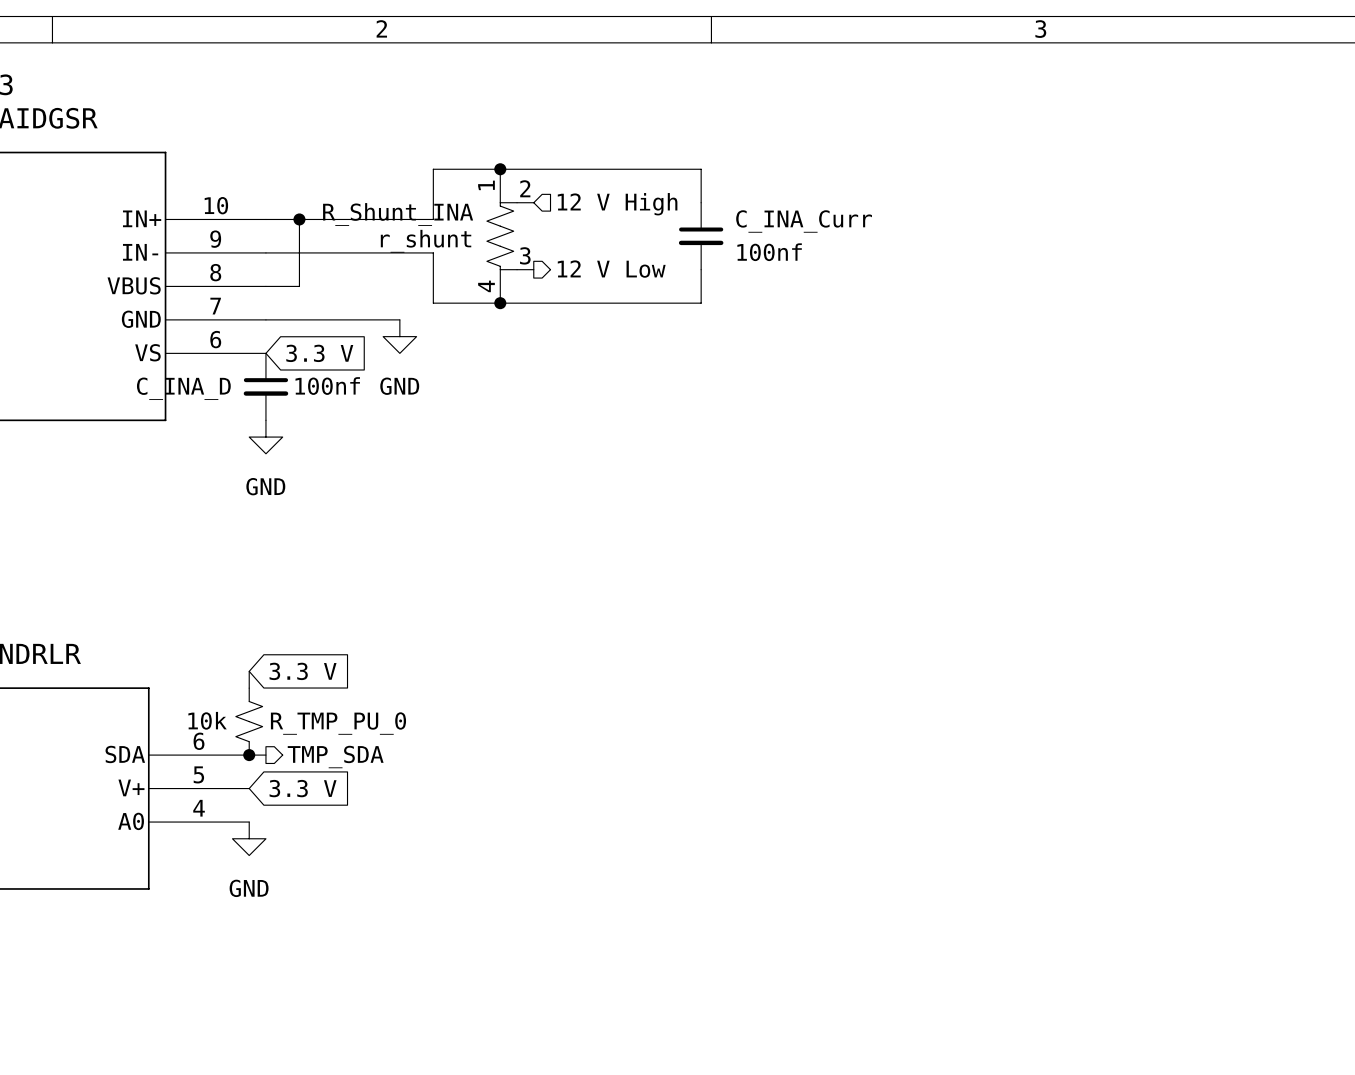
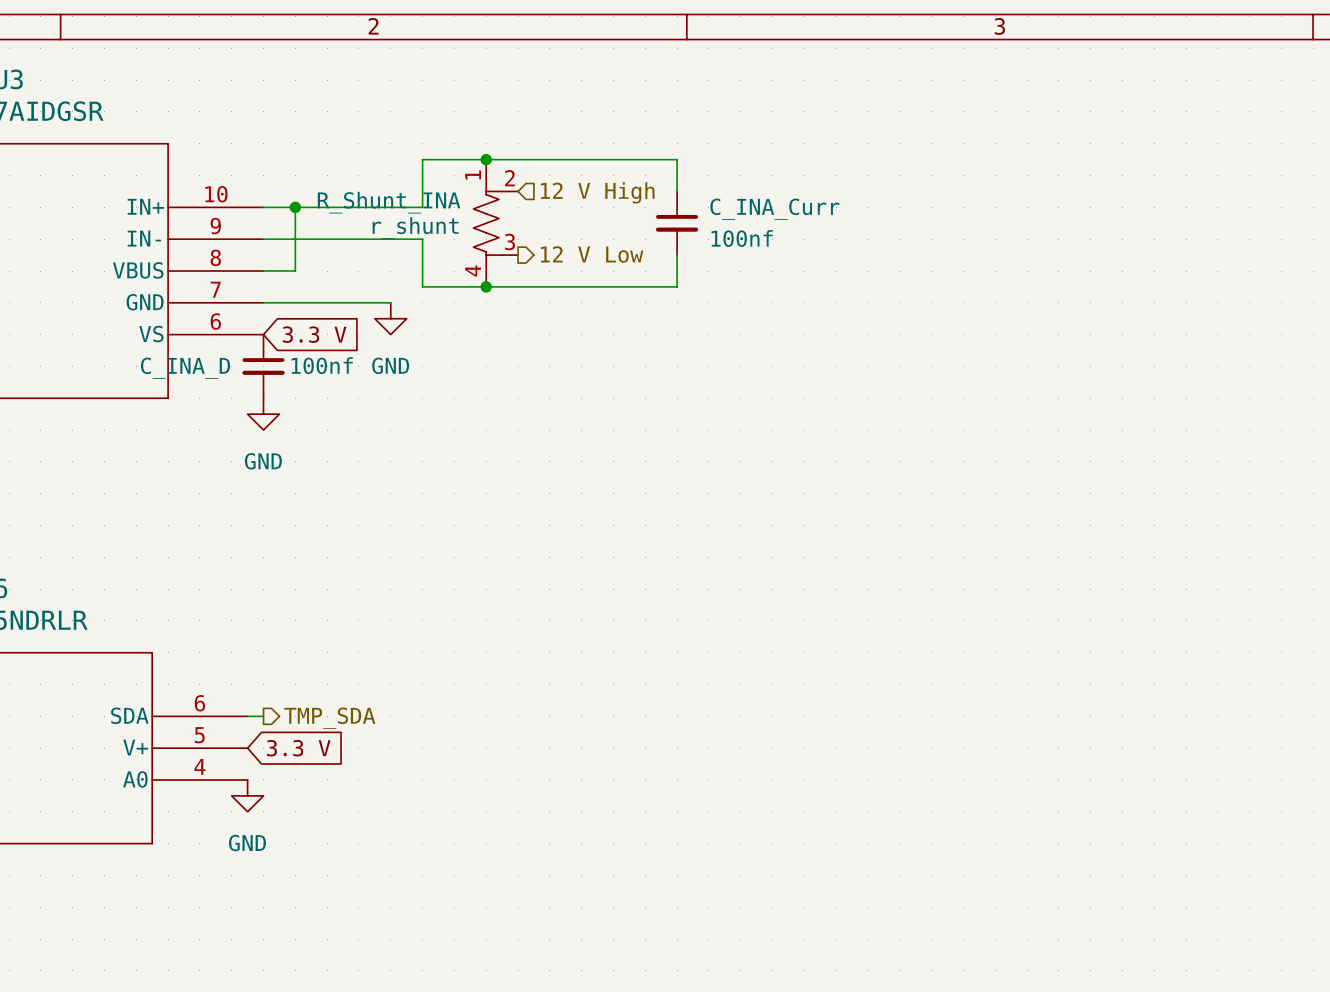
wire: (249, 671) (249, 688) -> none
global label: 3.3 V (303, 671) -> none
R_TMP_PU_0: 10k (249, 721) -> none
junction: (249, 755) -> none

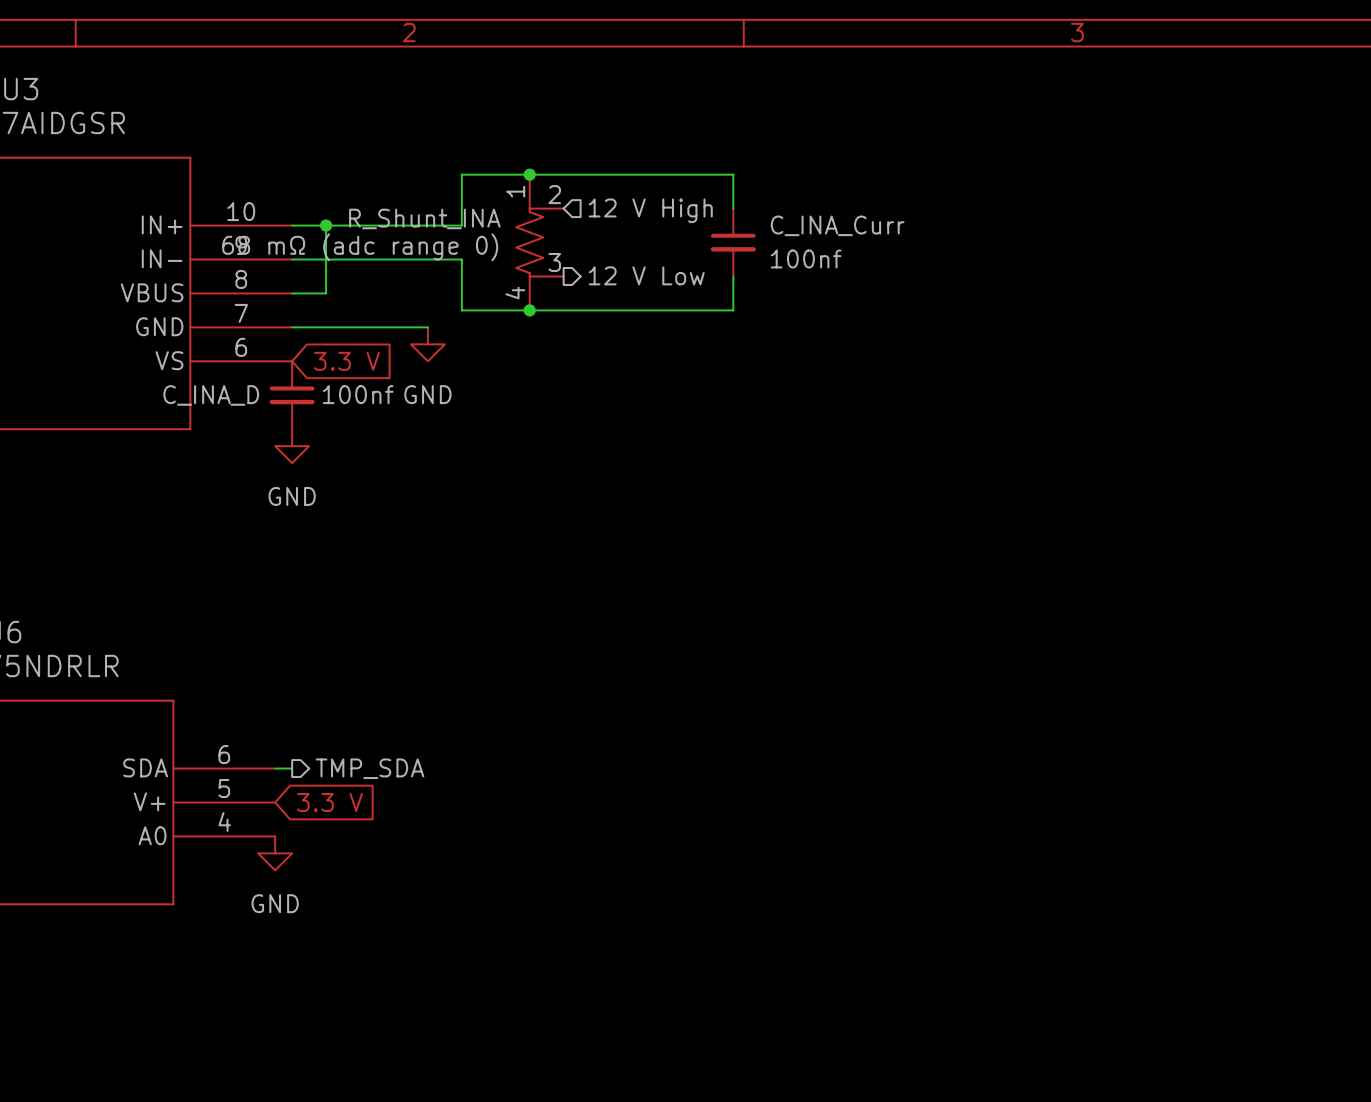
R_Shunt_INA value: r_shunt (415, 228) -> 68 mΩ (adc range 0) (360, 247)

